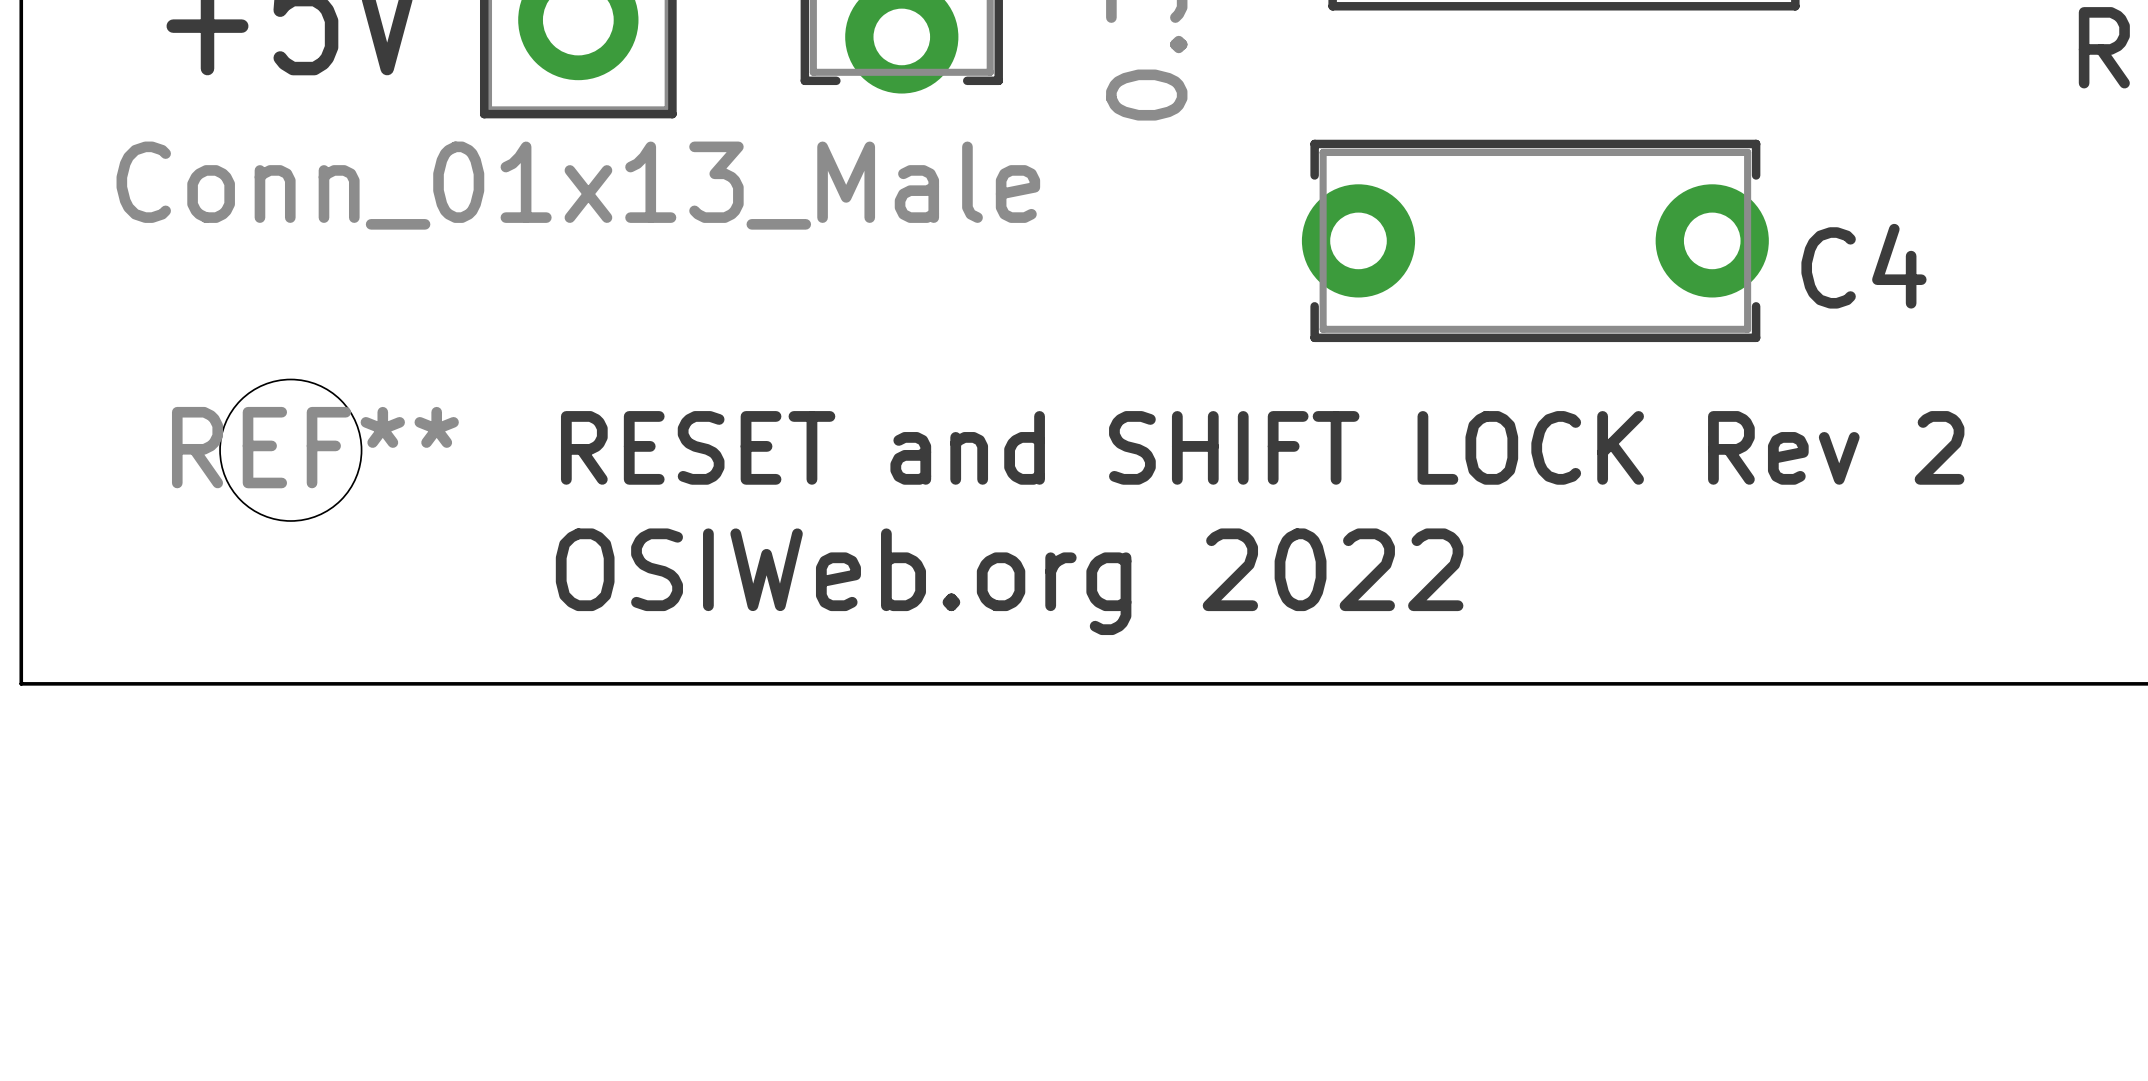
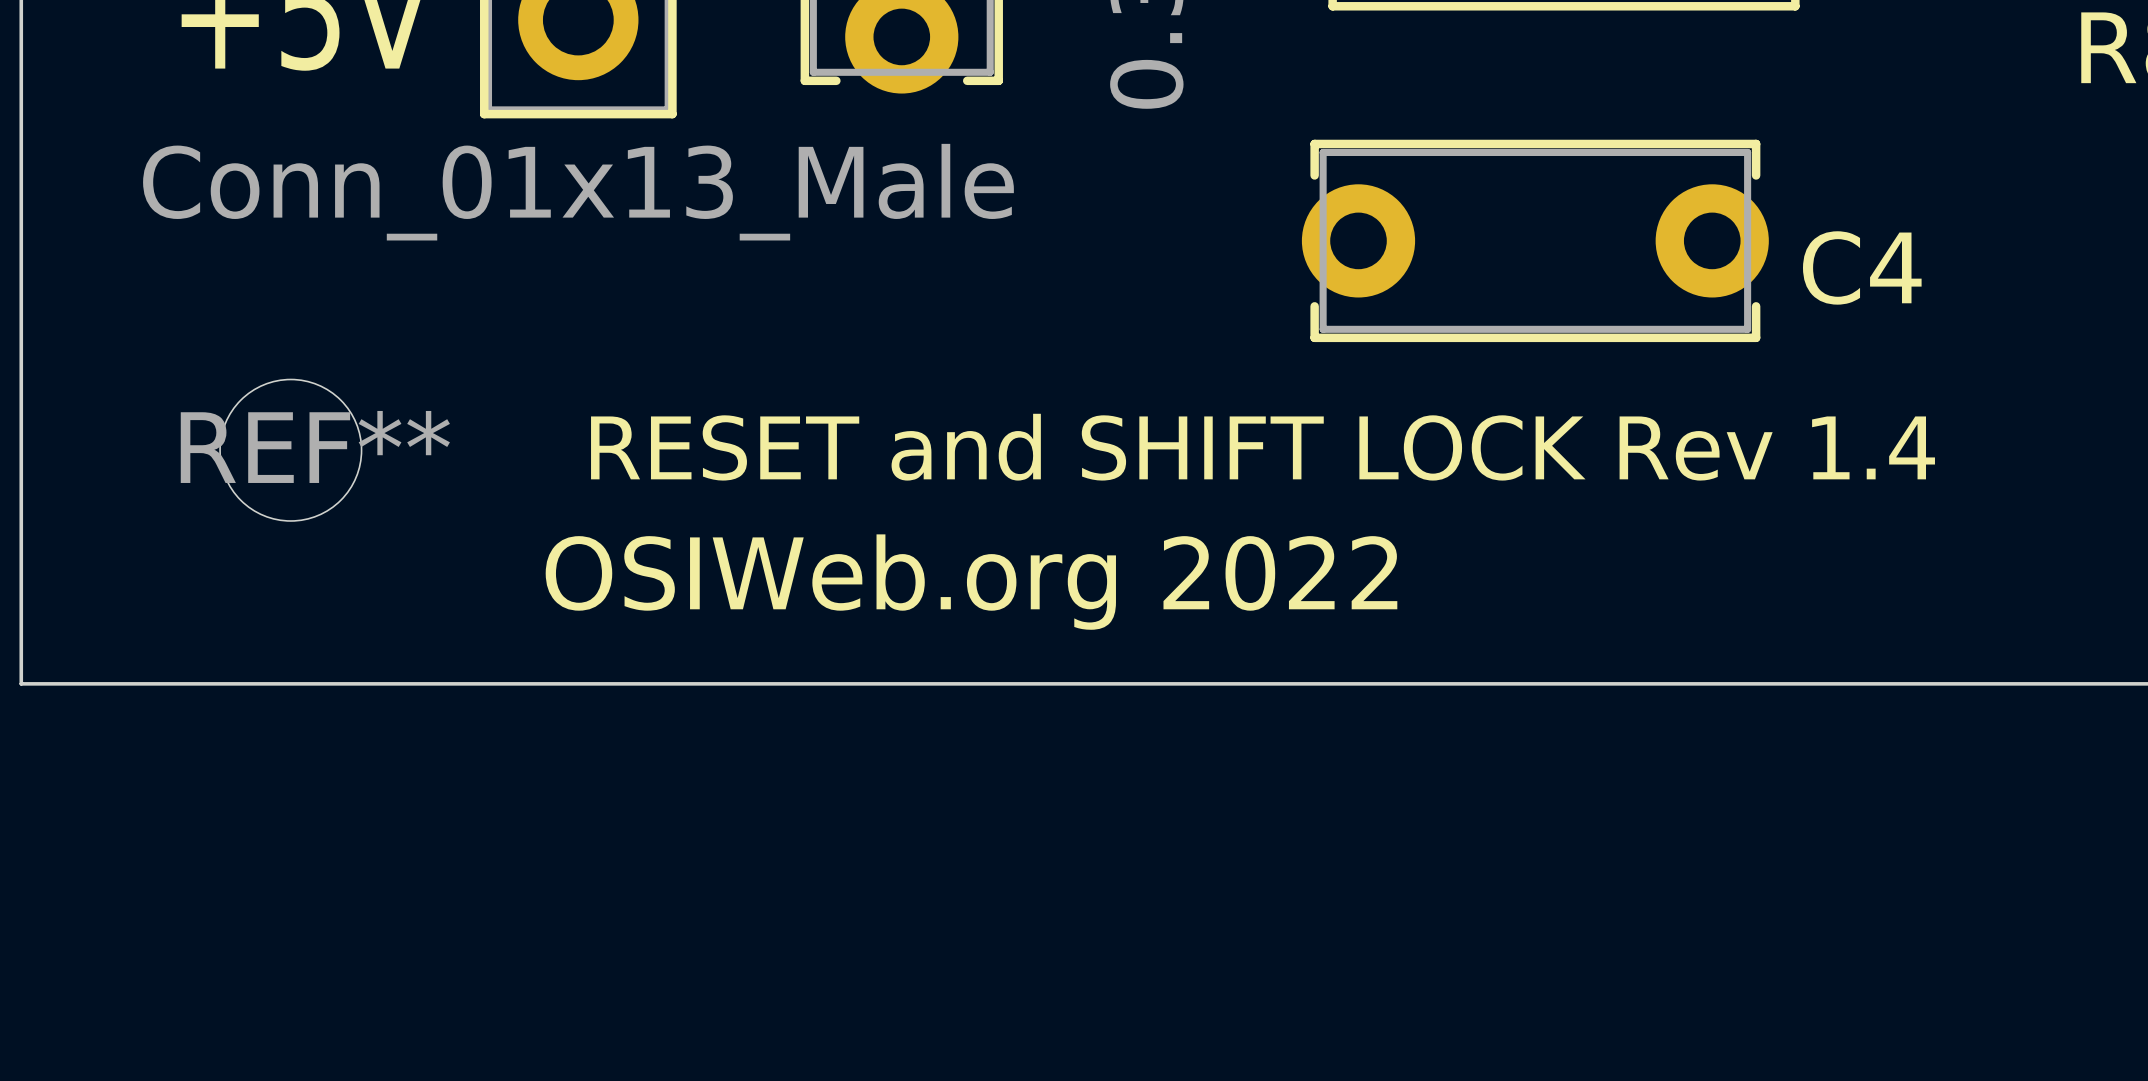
text: RESET and SHIFT LOCK Rev 2 (1262, 447) -> RESET and SHIFT LOCK Rev 1.4 (1263, 447)
text position: OSIWeb.org 2022 (1009, 581) -> OSIWeb.org 2022 (971, 582)

